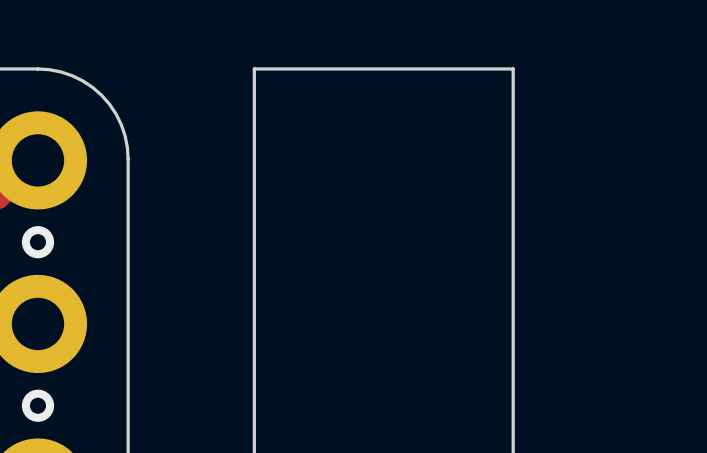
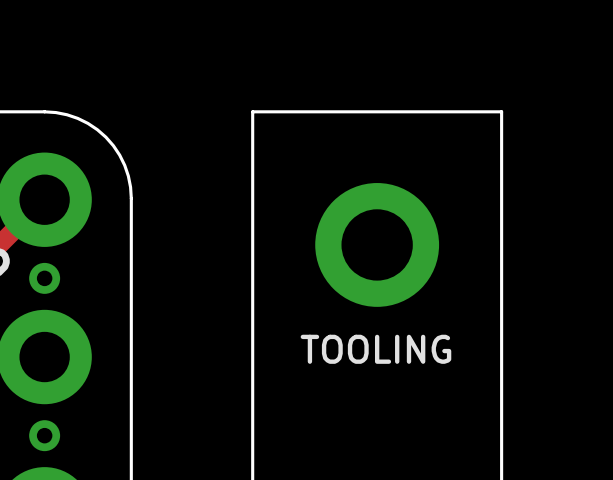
part: none -> (377, 244)

